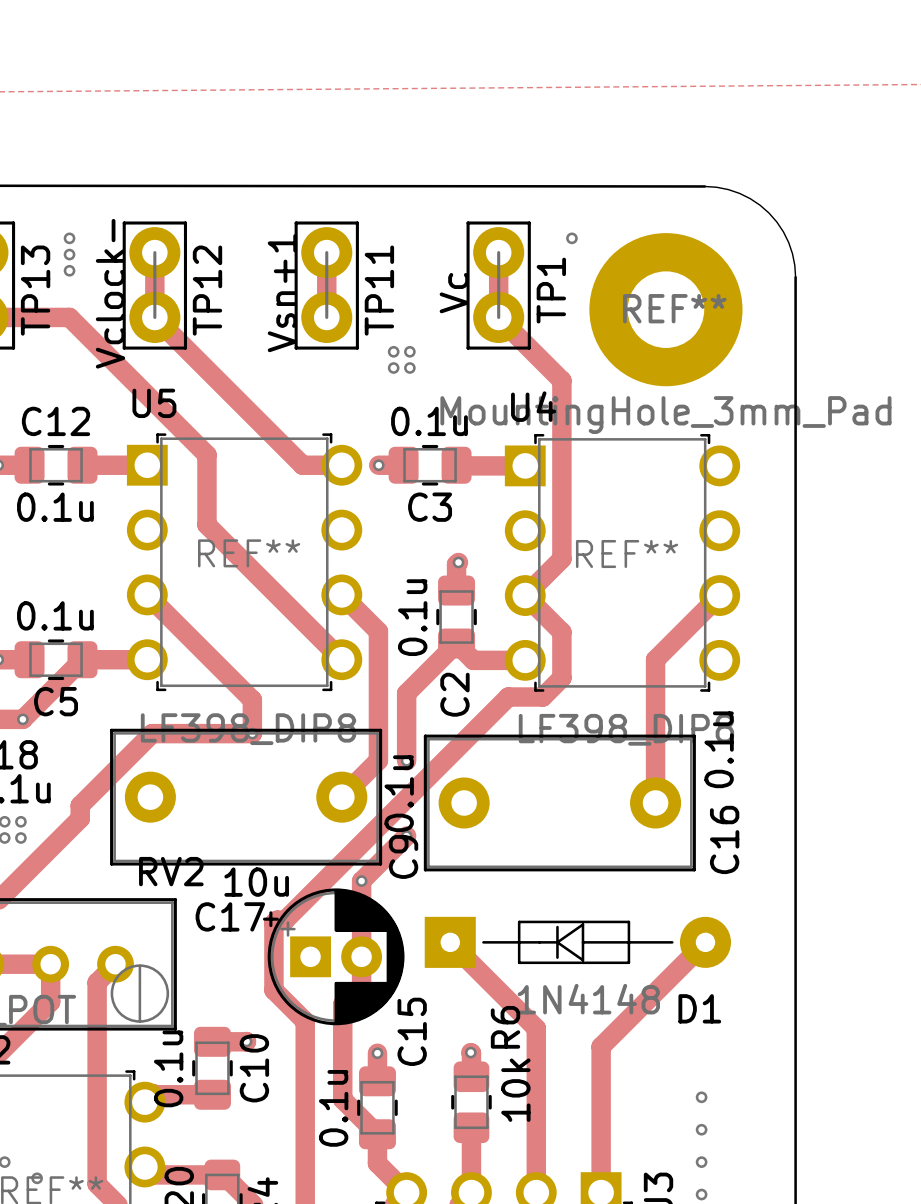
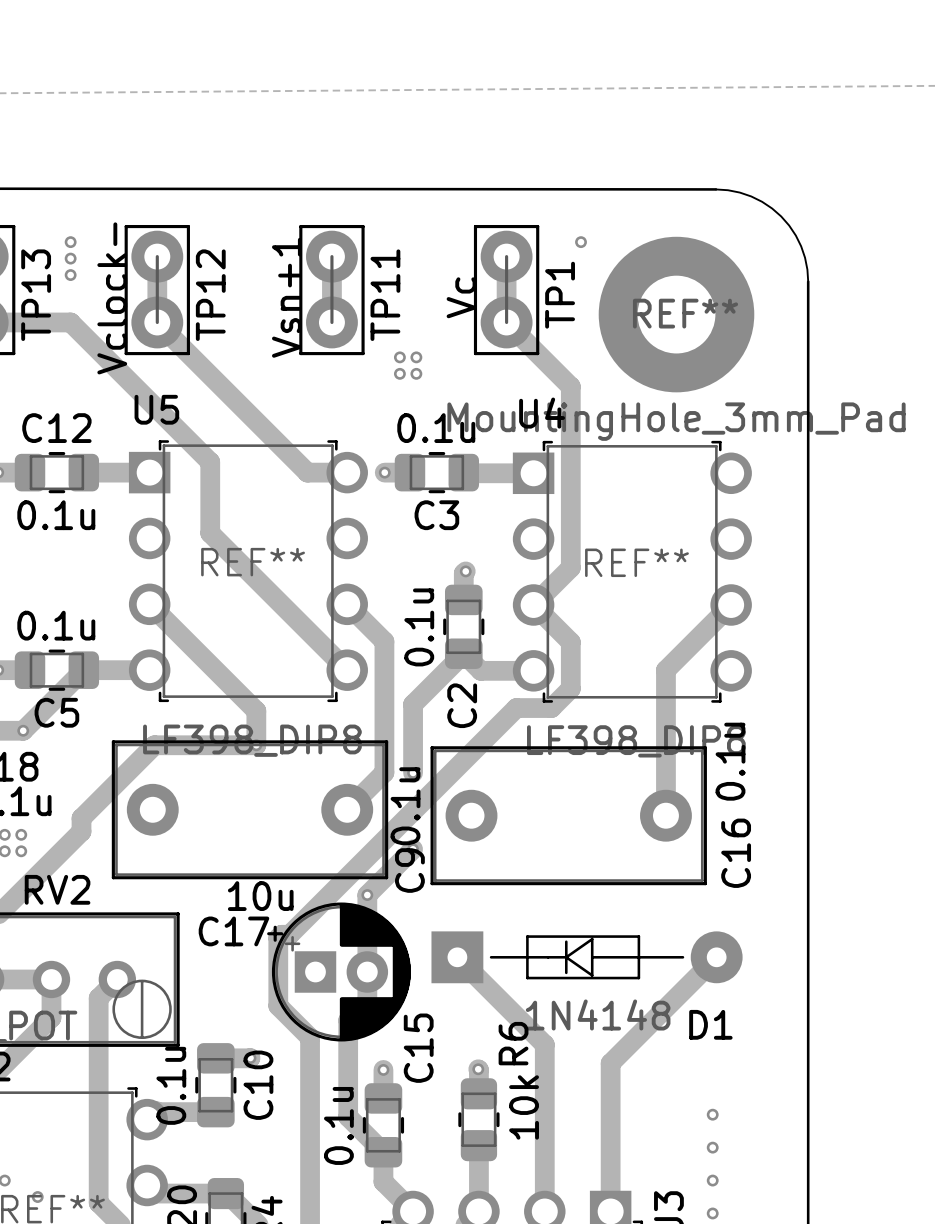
RV2 name position: RV2 (171, 871) -> RV2 (57, 889)

